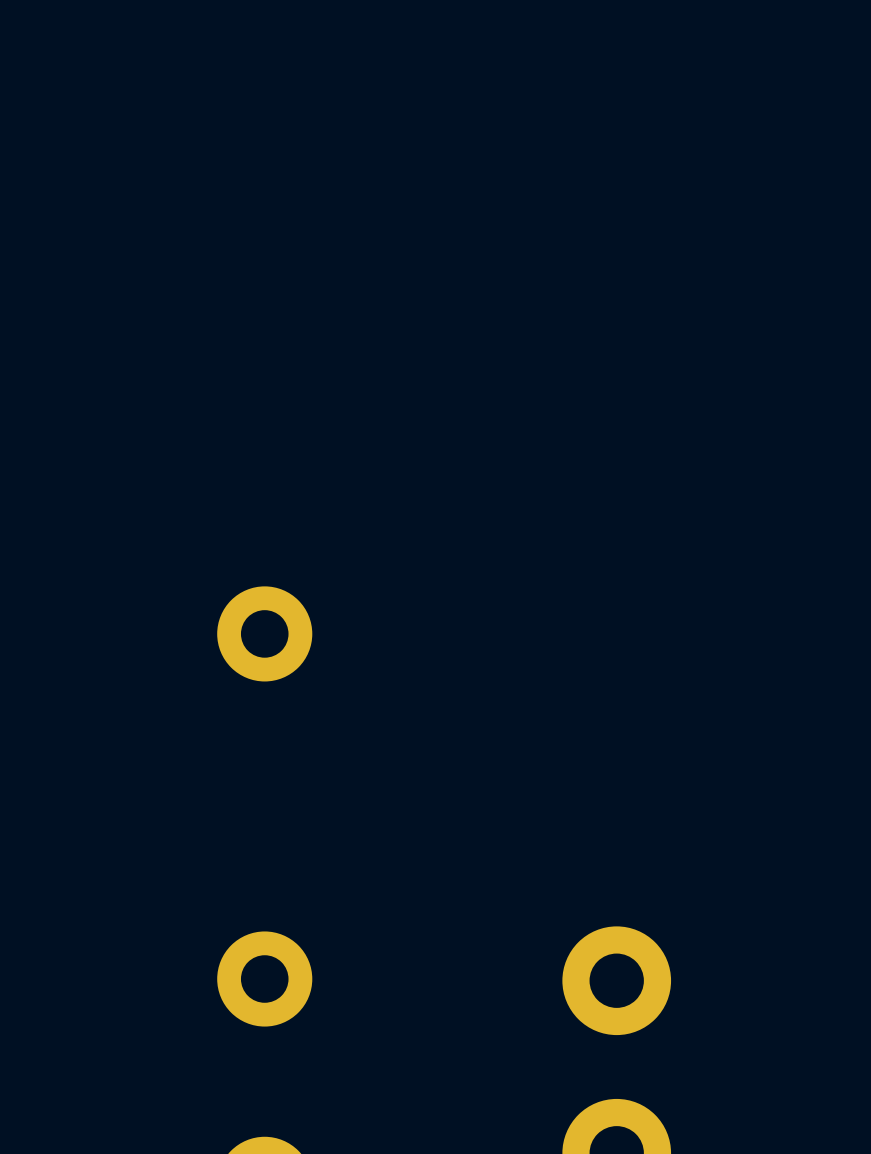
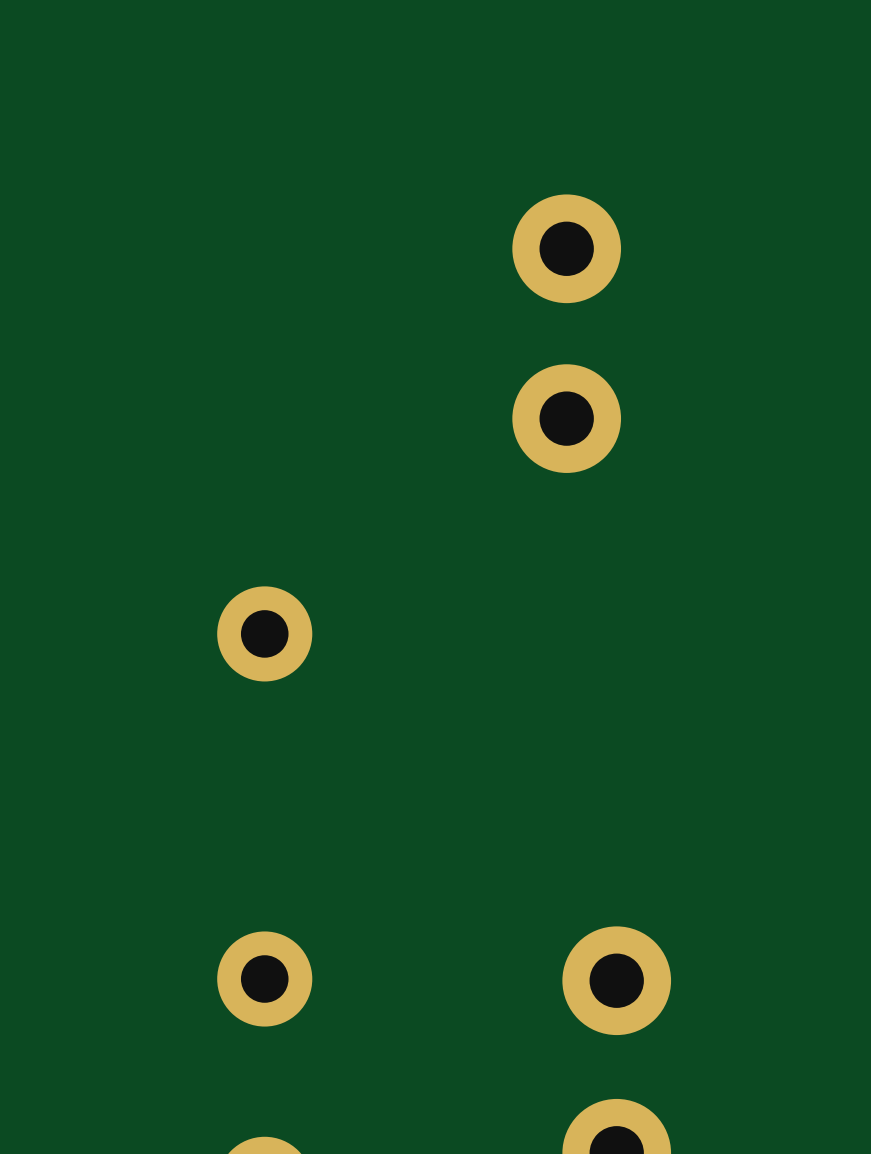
part: none -> (566, 333)

